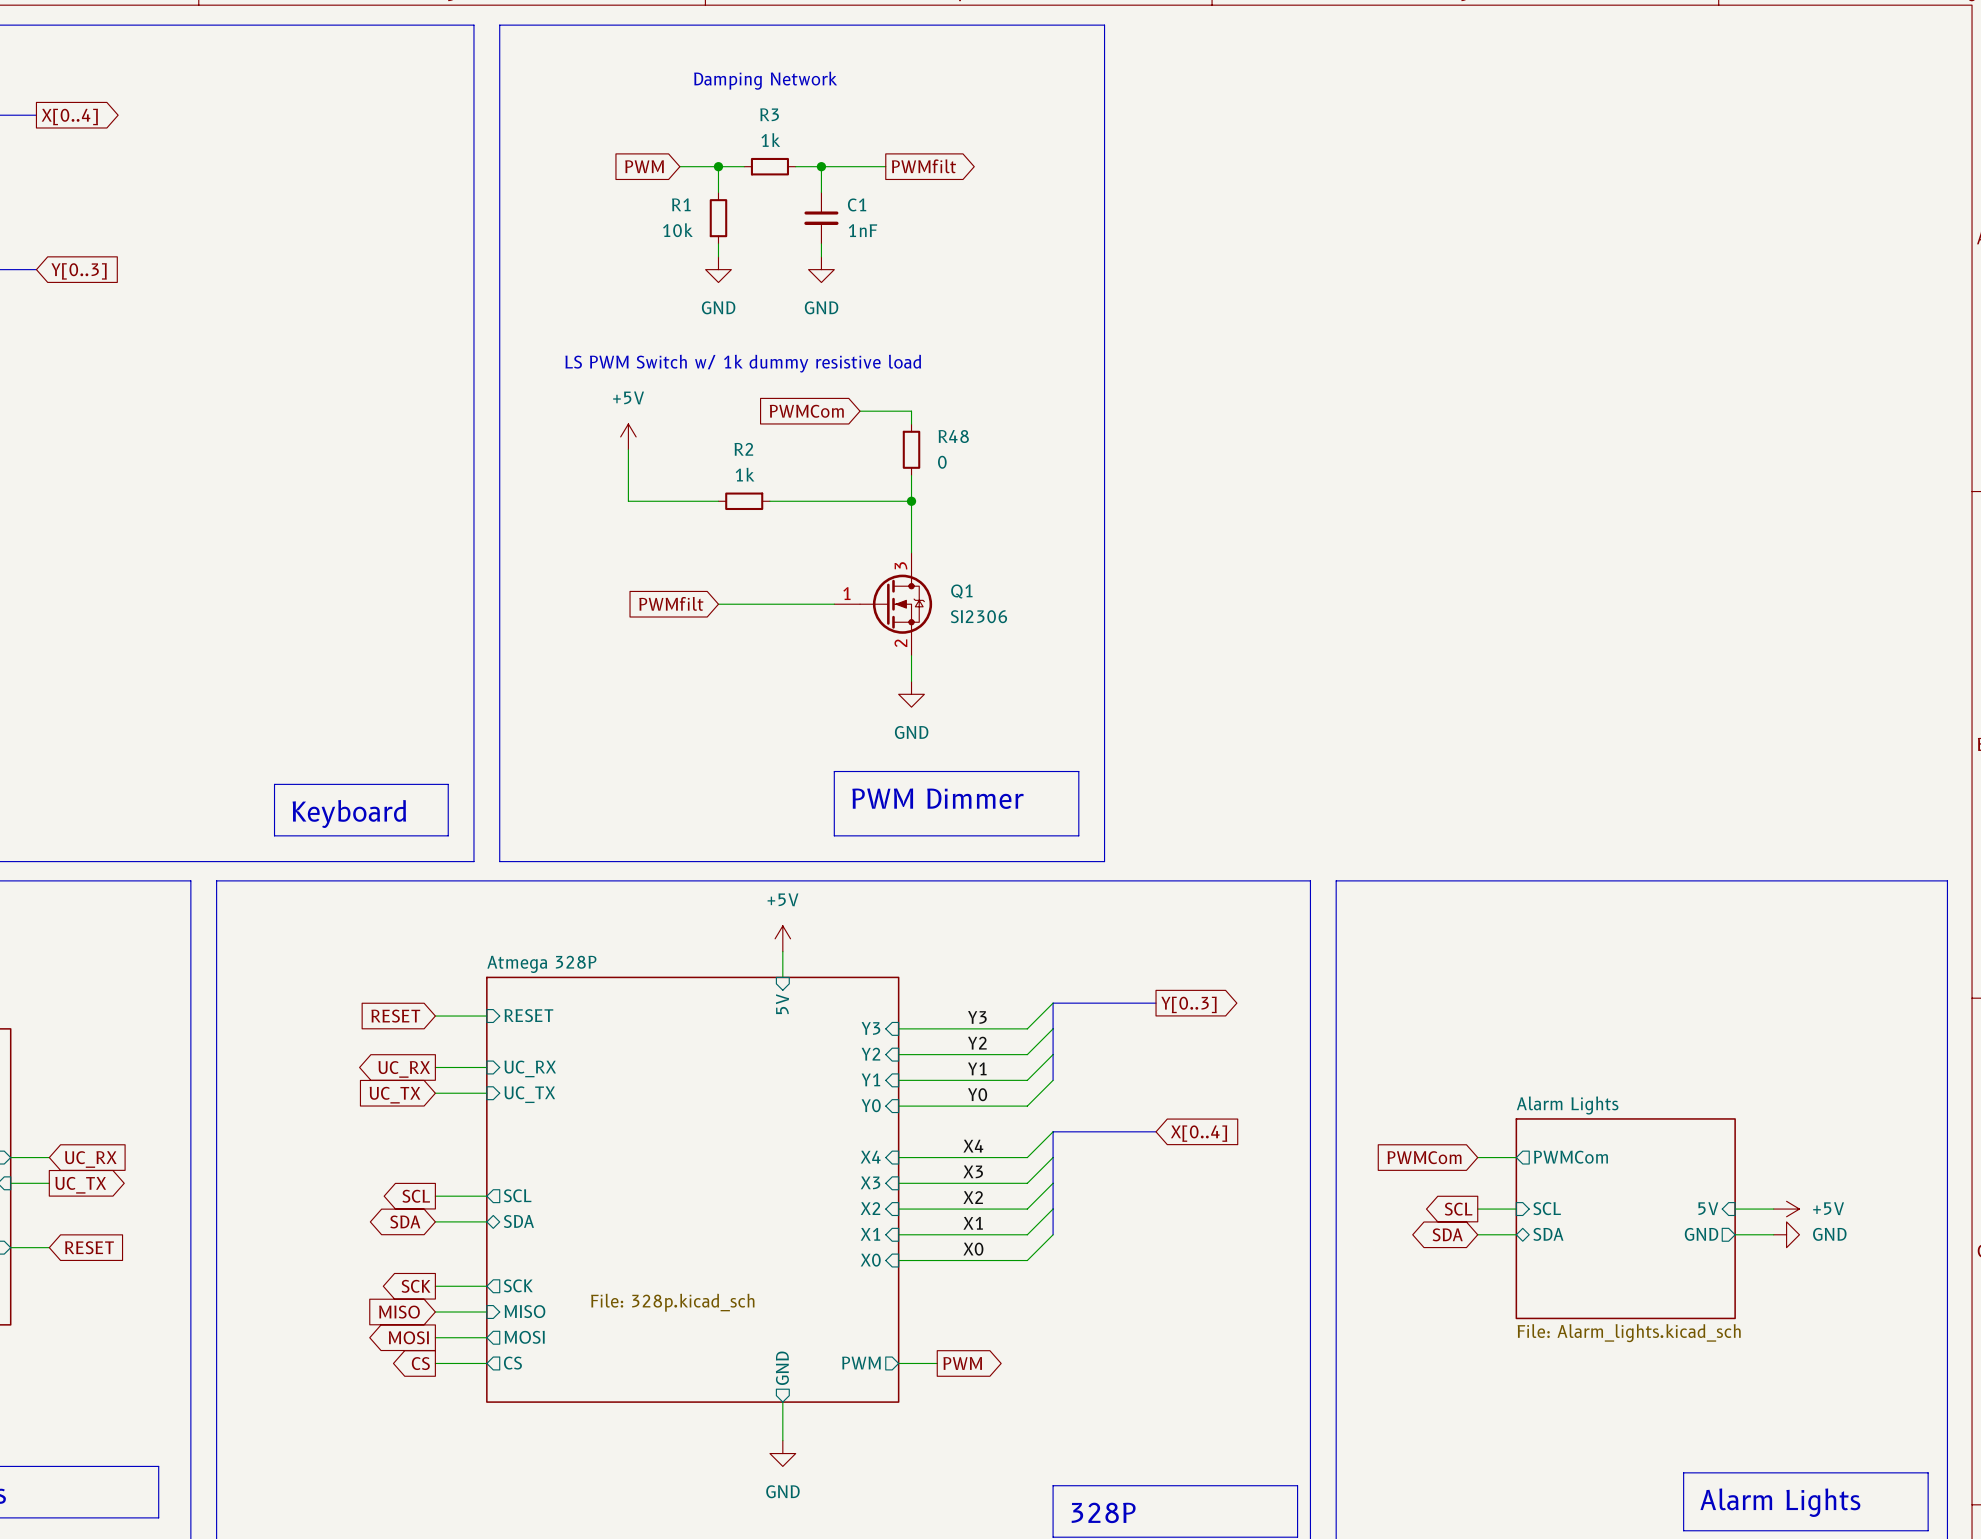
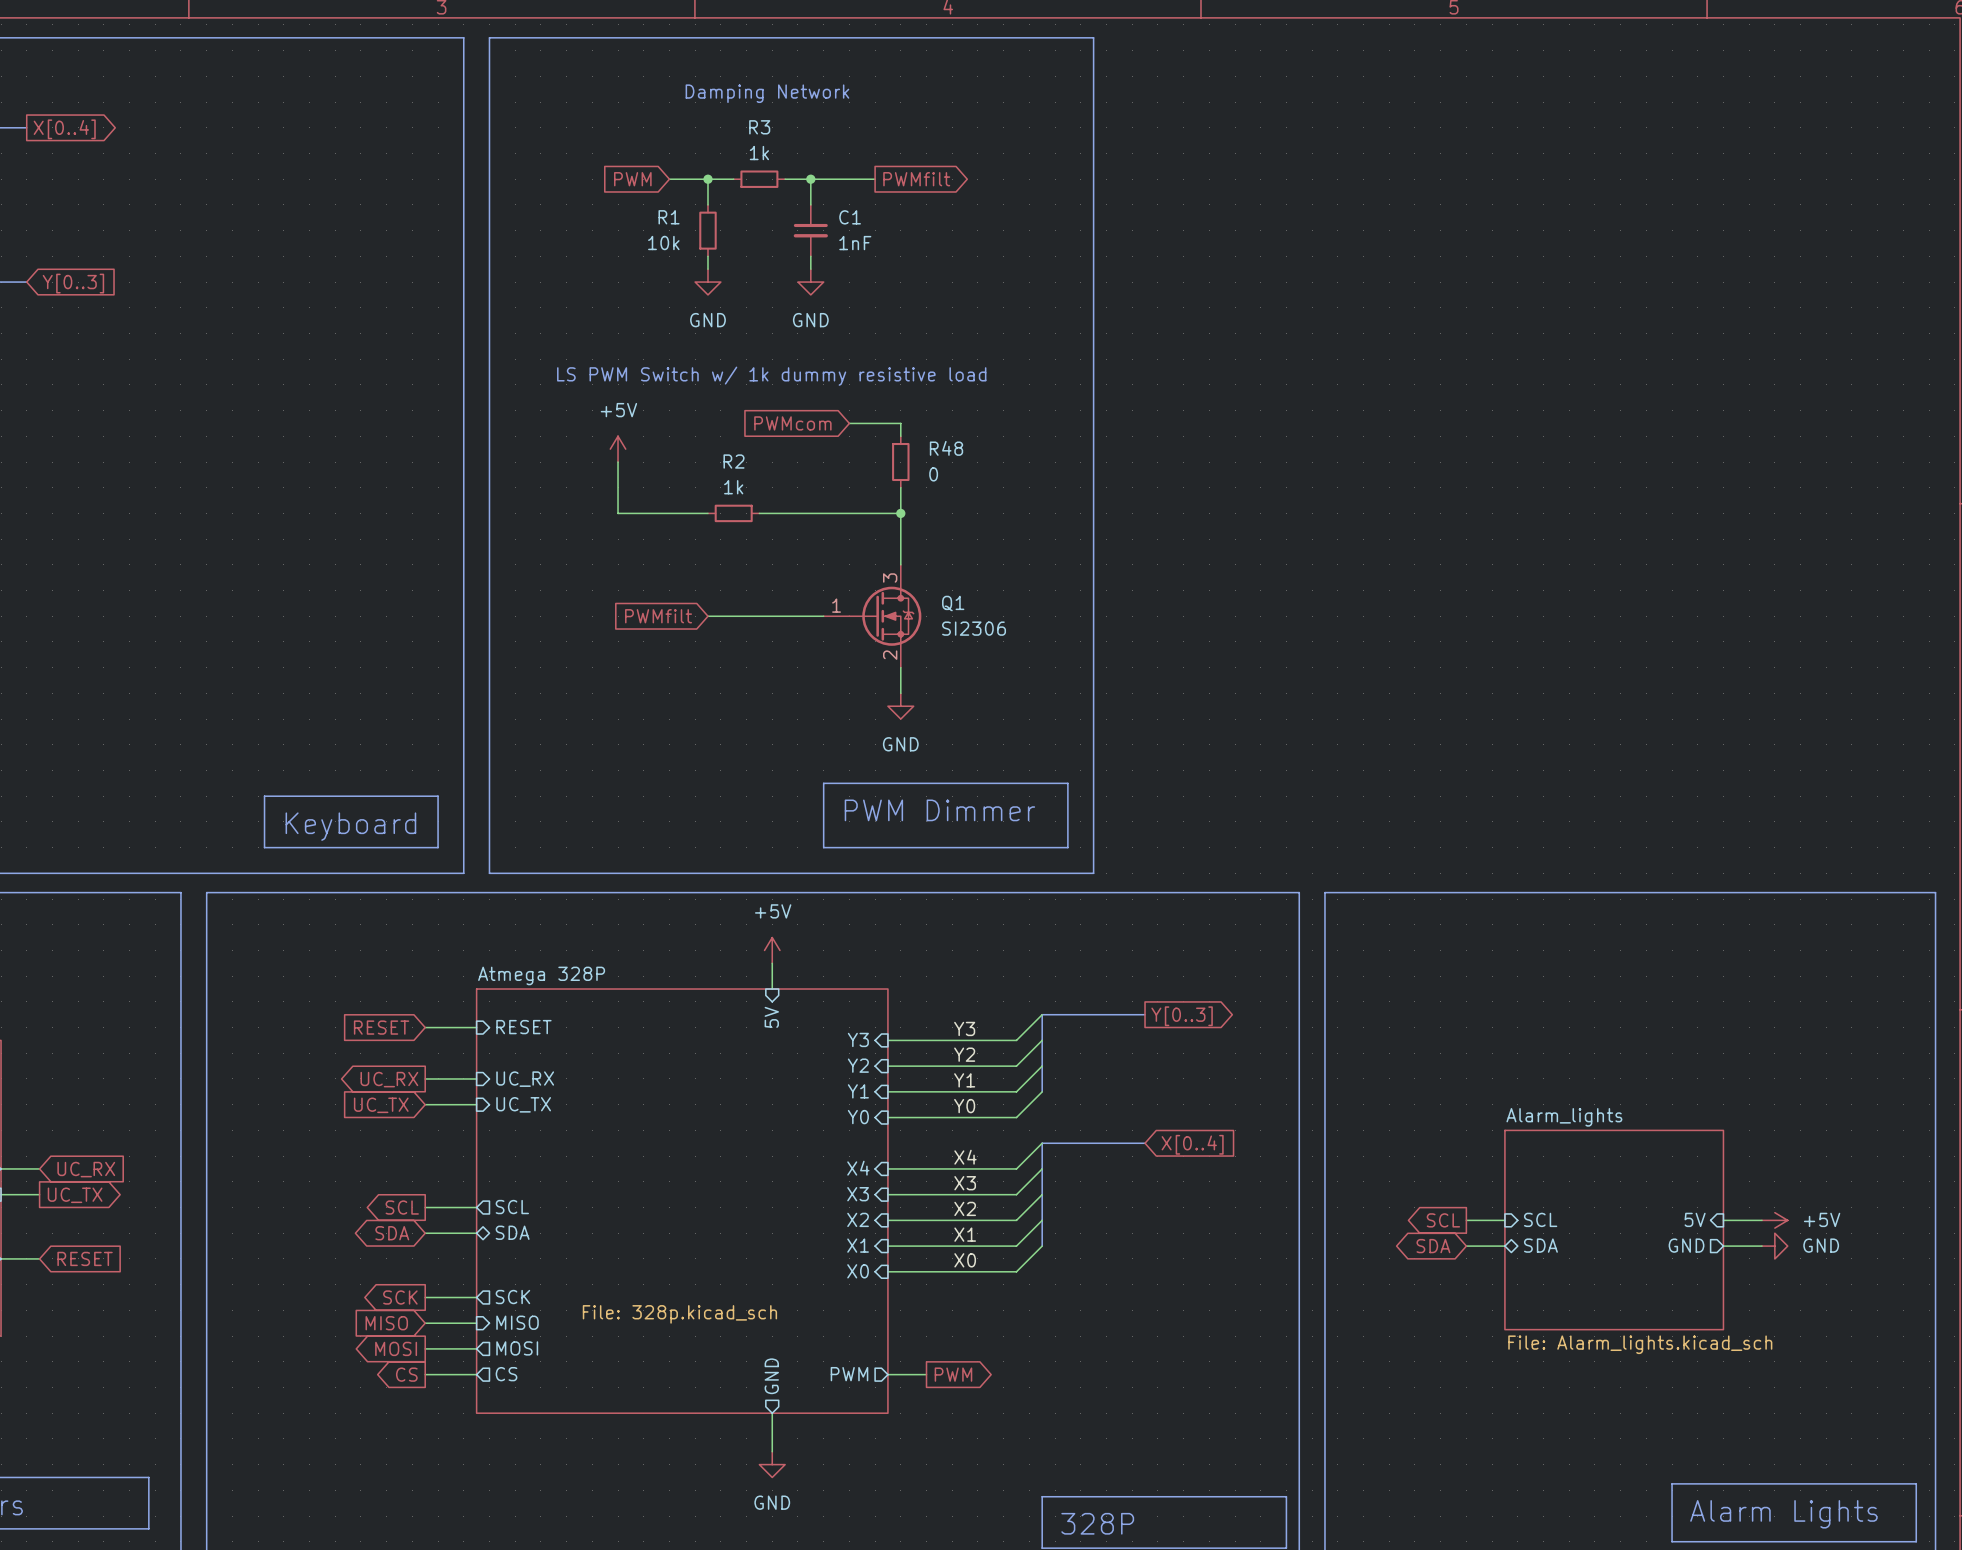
global label: PWMCom (806, 411) -> PWMcom (792, 423)
sheet Alarm Lights name: Alarm Lights (1567, 1105) -> Alarm_lights (1564, 1117)
global label: PWMCom (1424, 1157) -> none
wire: (1477, 1157) (1516, 1157) -> none
sheet pin: PWMCom (1570, 1157) -> none

